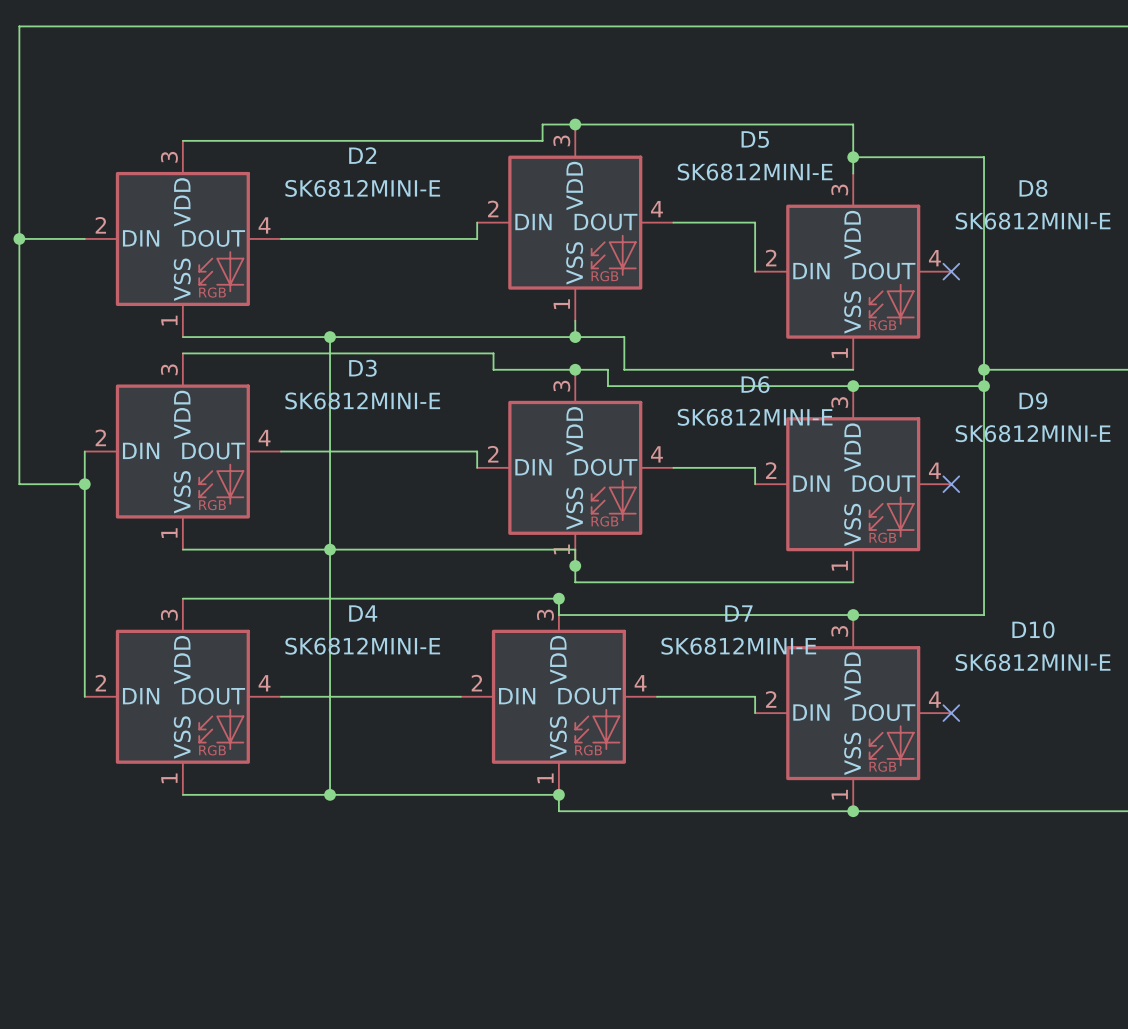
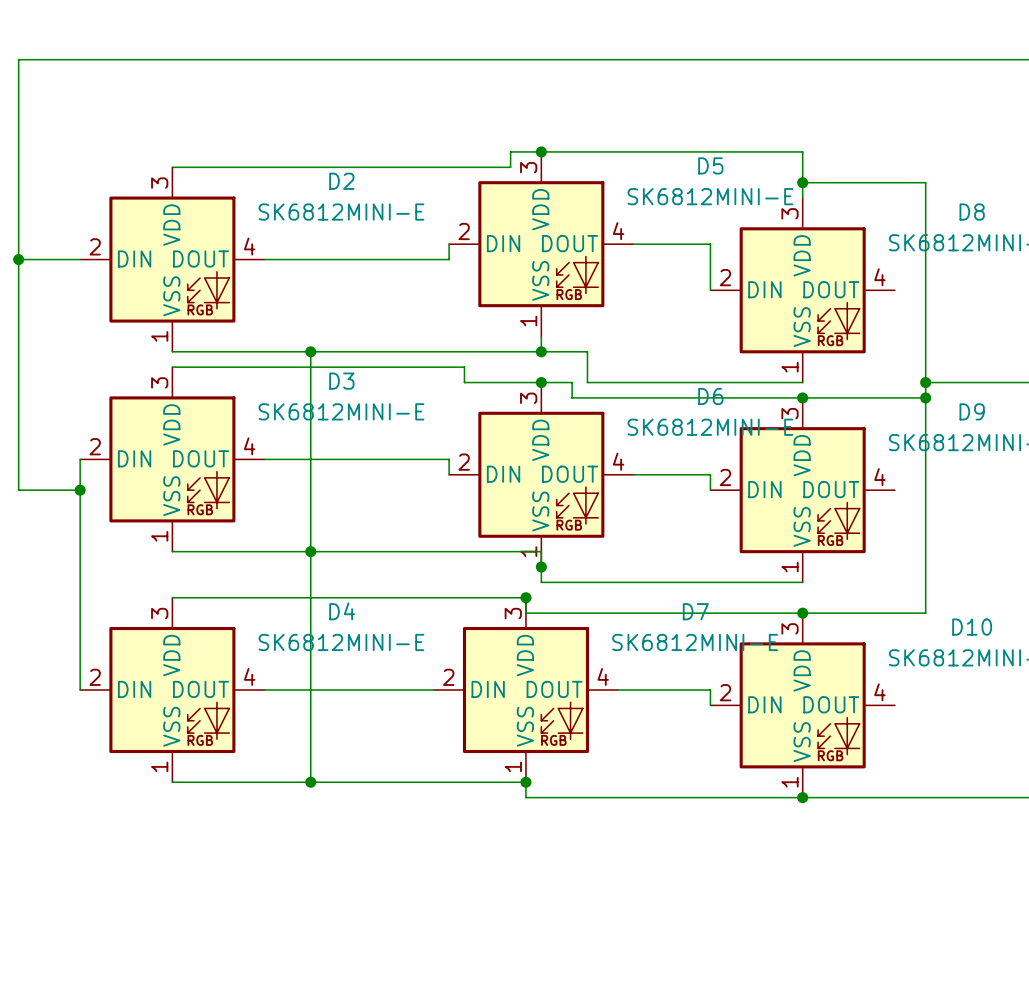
no-connect mark: (951, 271) -> none
no-connect mark: (951, 484) -> none
no-connect mark: (951, 713) -> none

